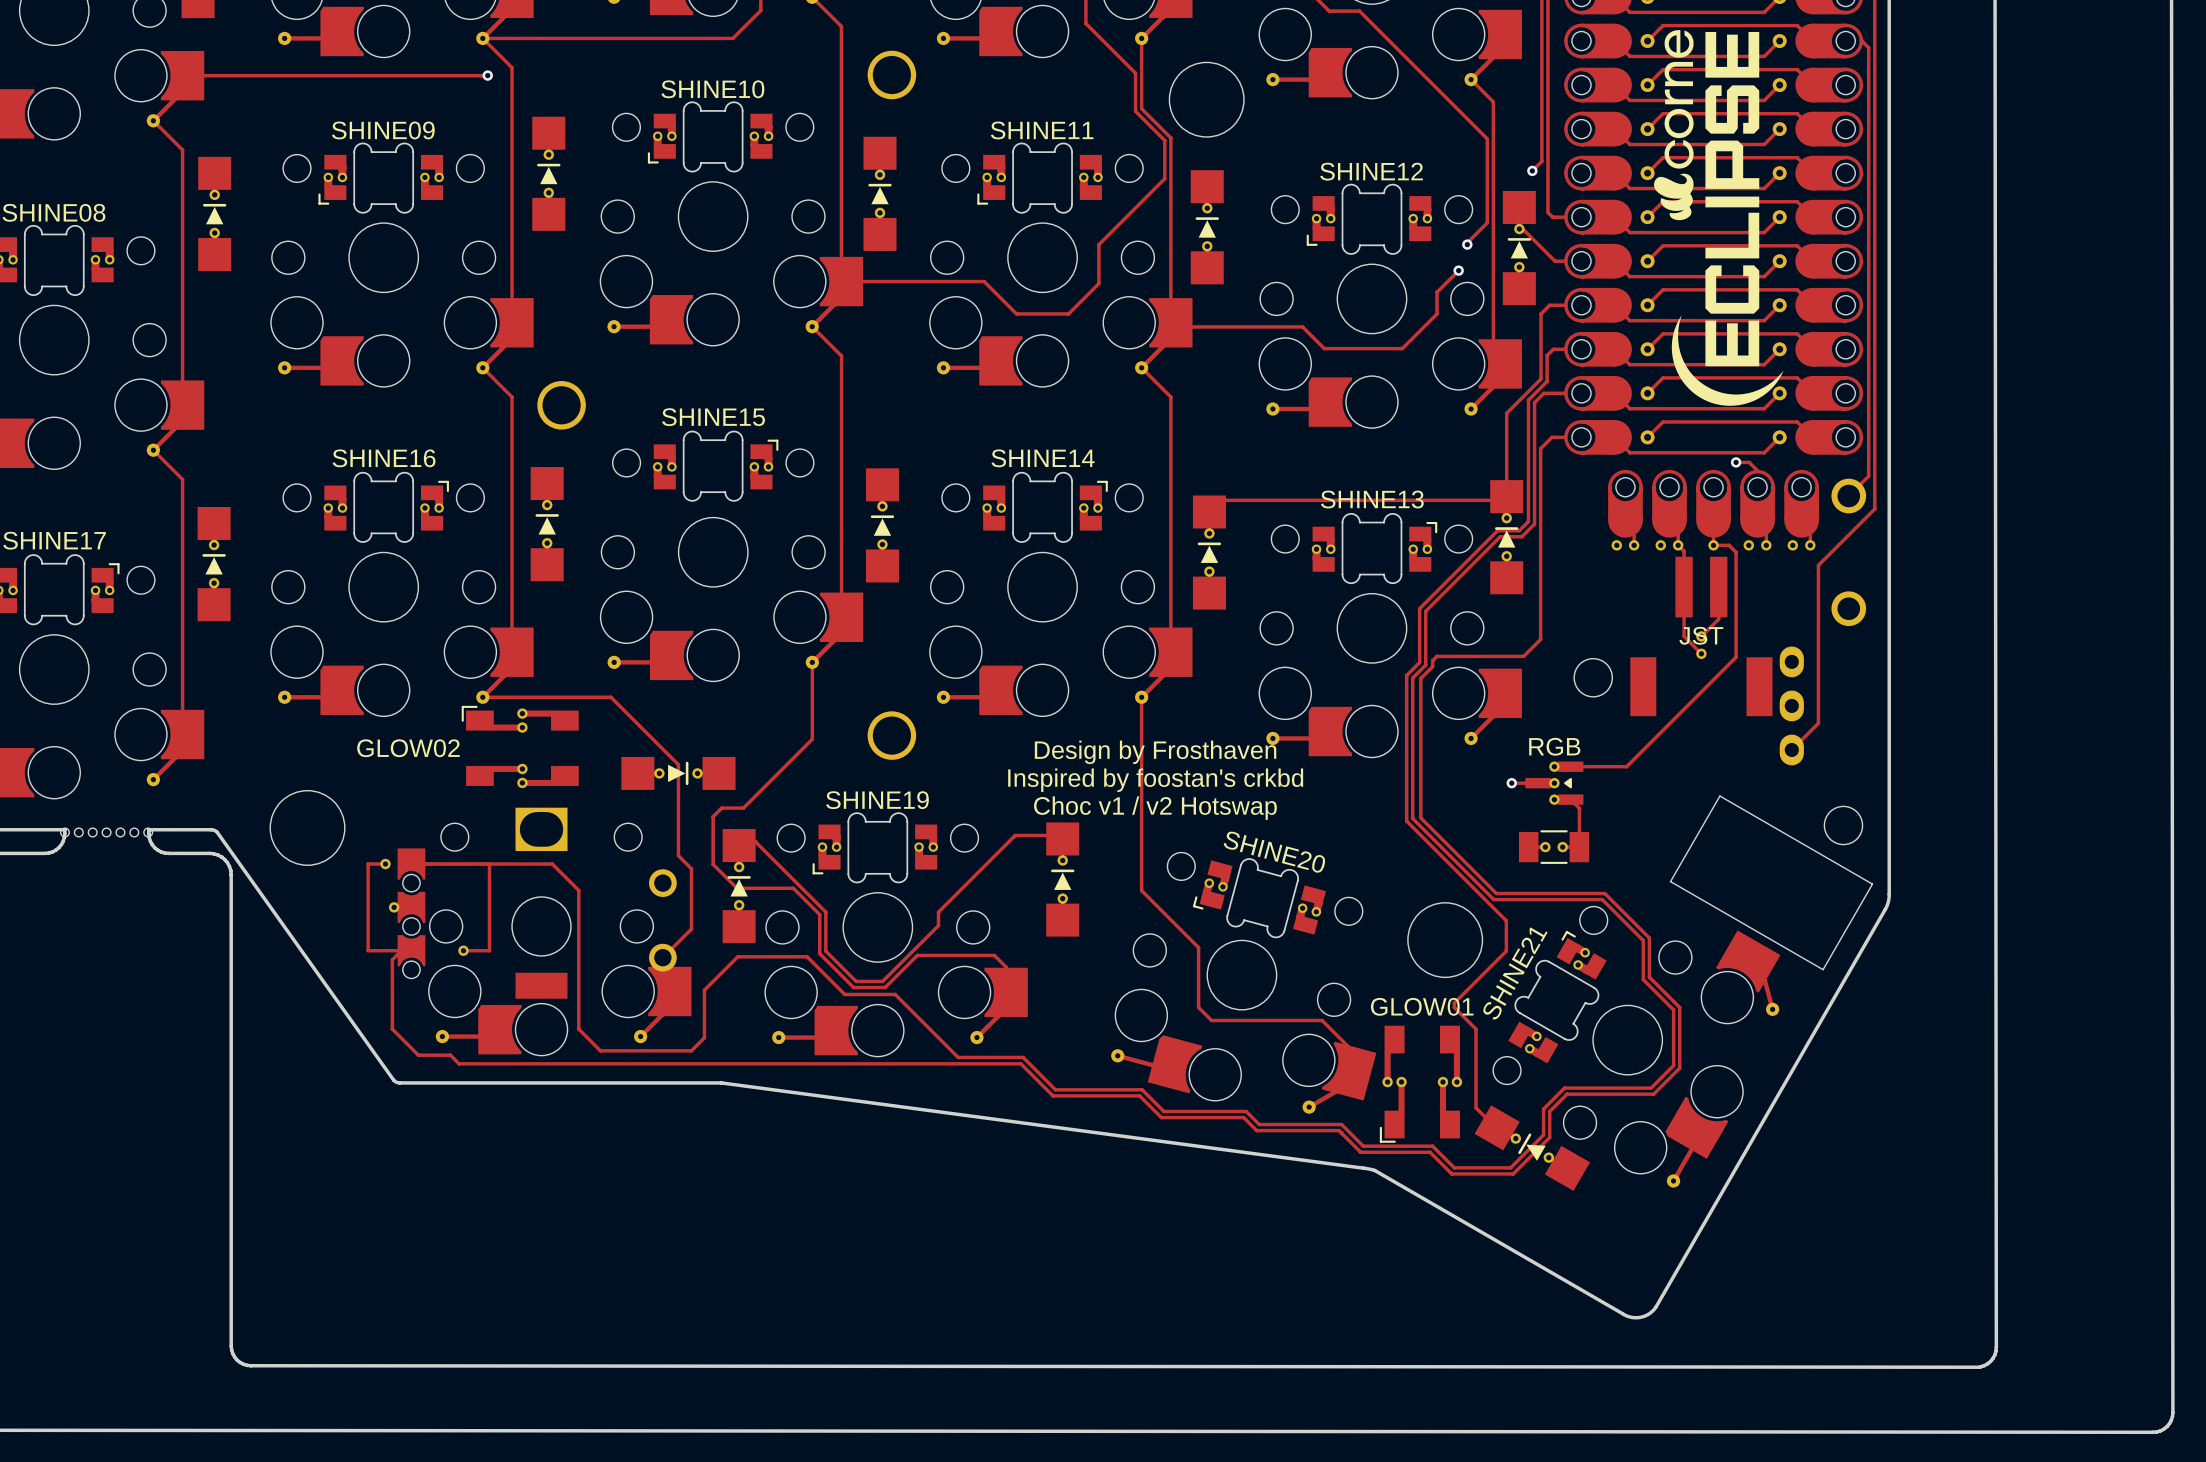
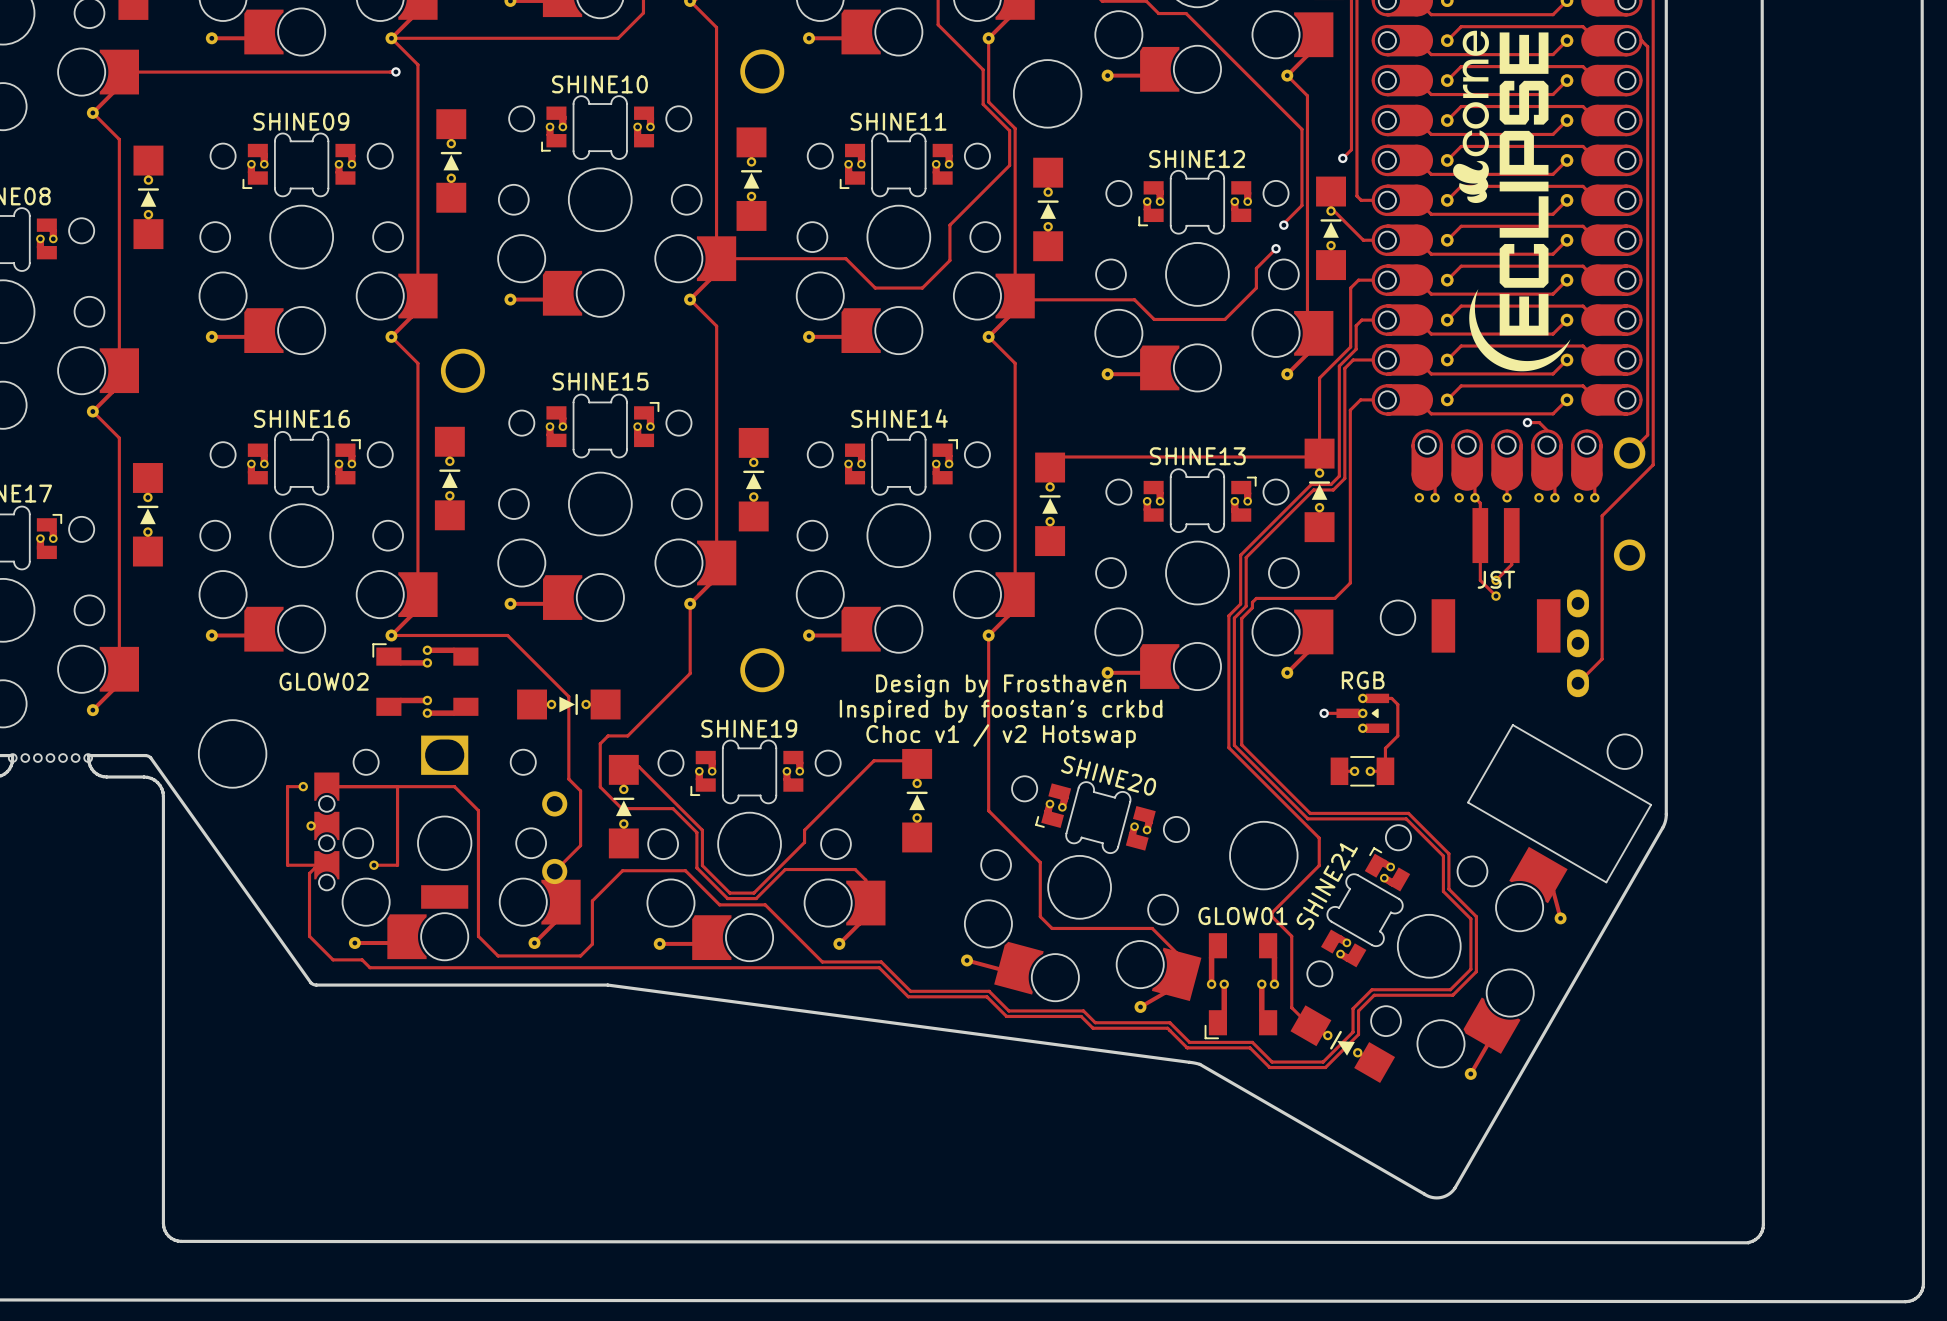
track: (1713, 545) (1729, 545) (1736, 552) (1736, 657) (1626, 766) (1586, 766) -> none
track: (1570, 799) (1579, 808) (1579, 821) -> (1391, 698) (1397, 704) (1397, 735) (1385, 748)

